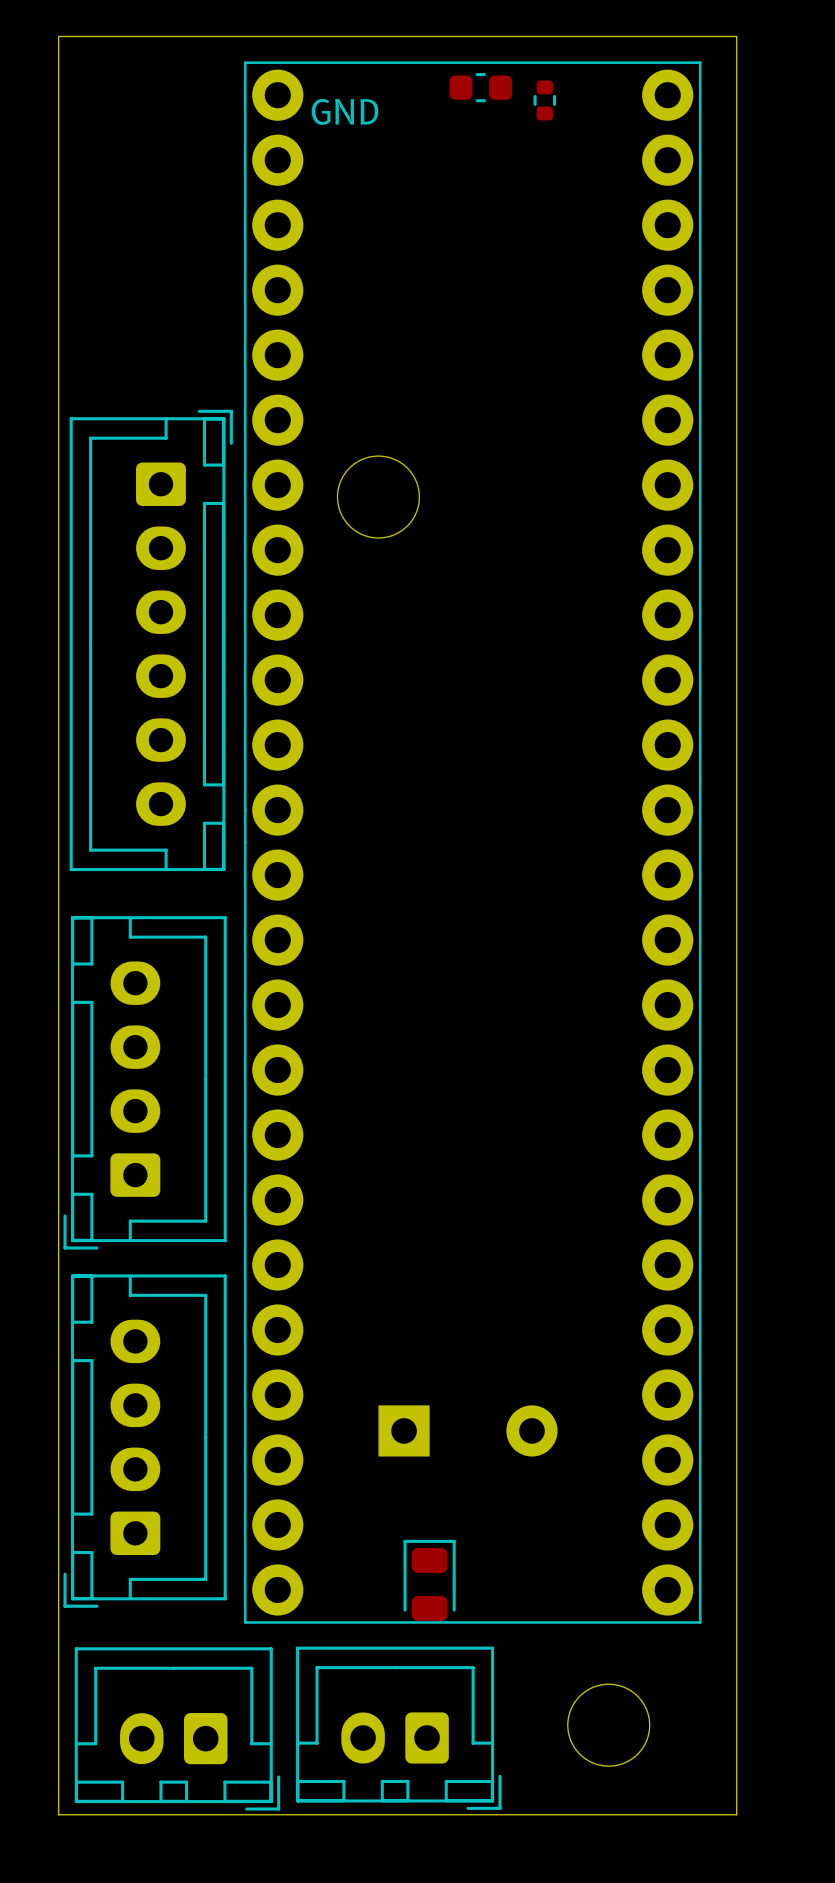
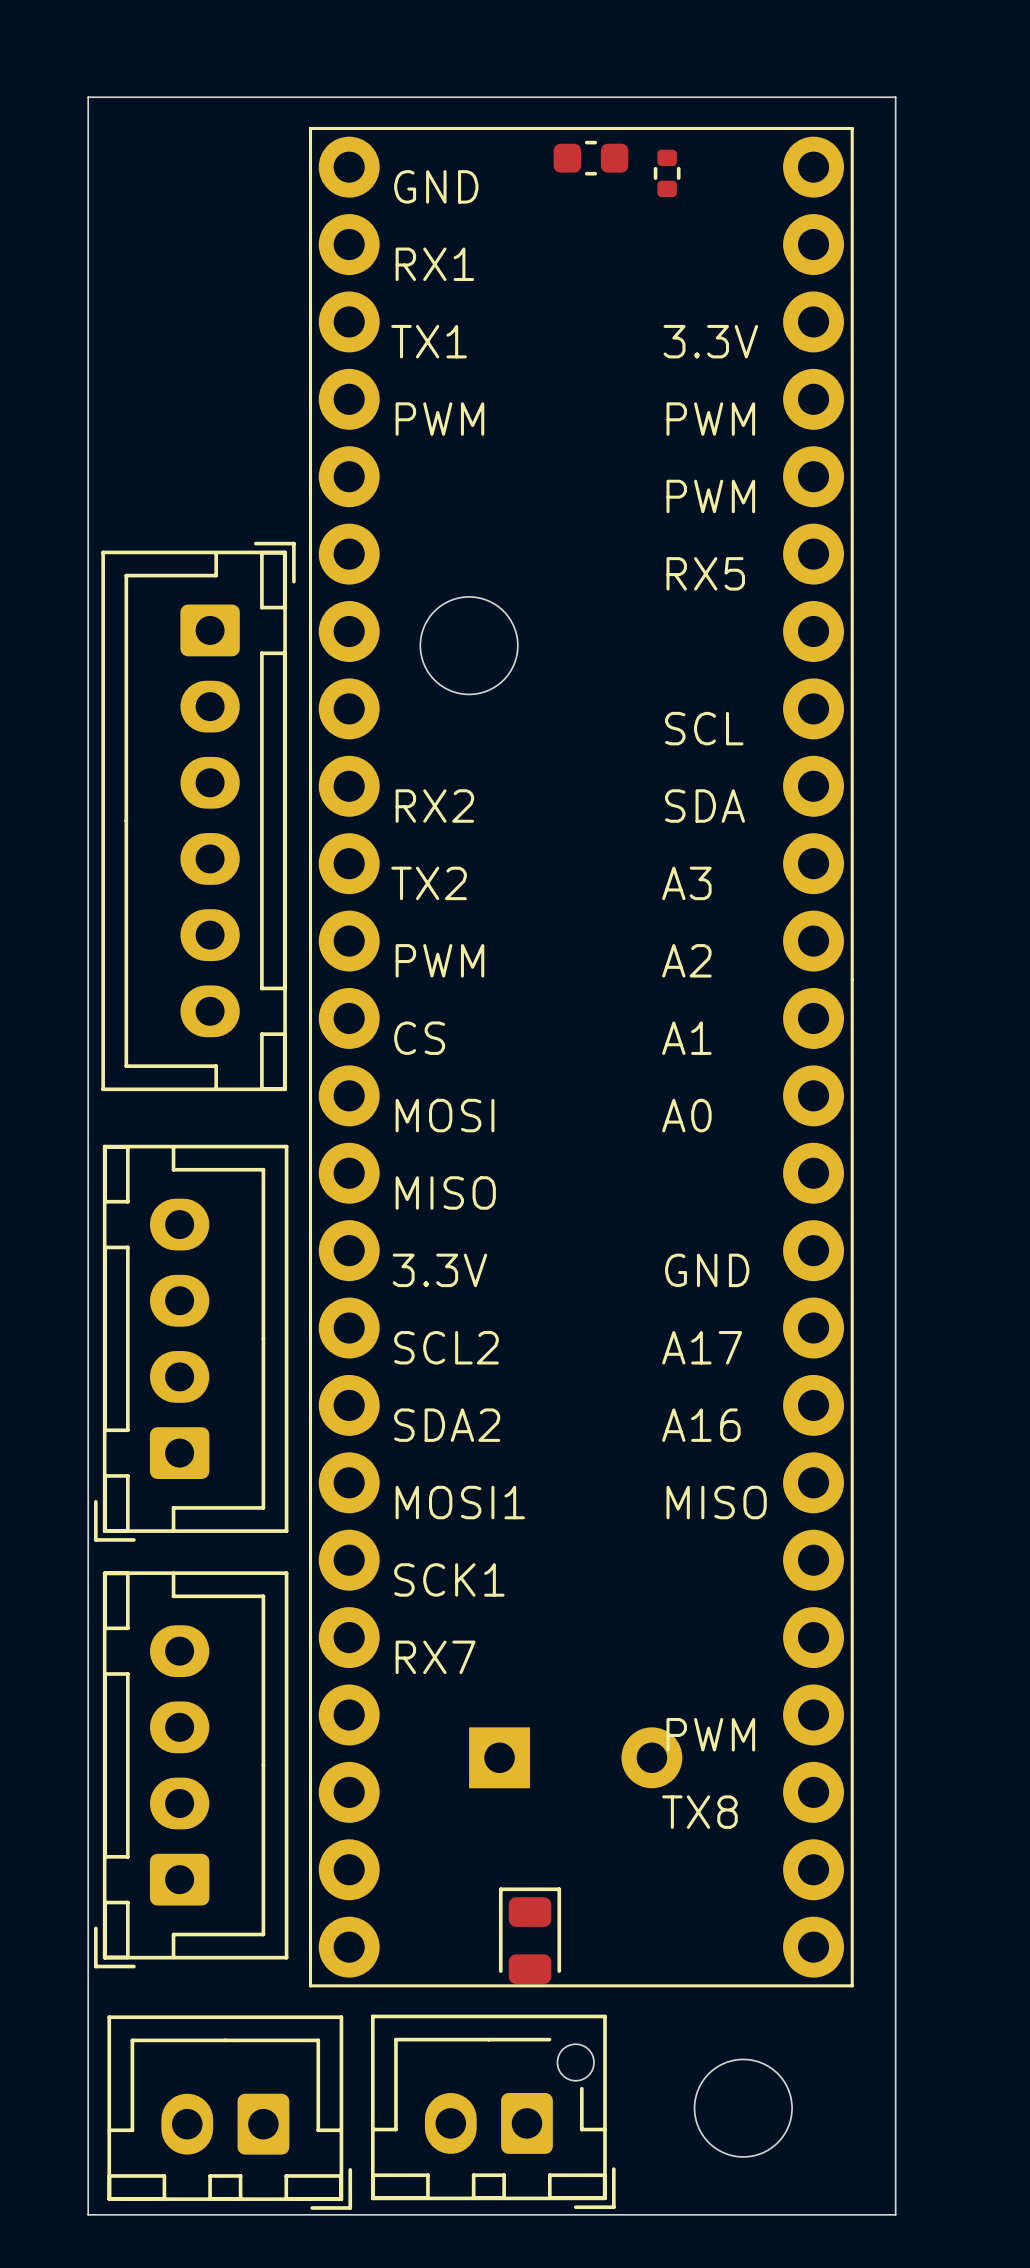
part footprint: [243, 61, 702, 1624] -> [308, 126, 854, 1988]
part footprint: [296, 1646, 502, 1810] -> [370, 2014, 616, 2210]

